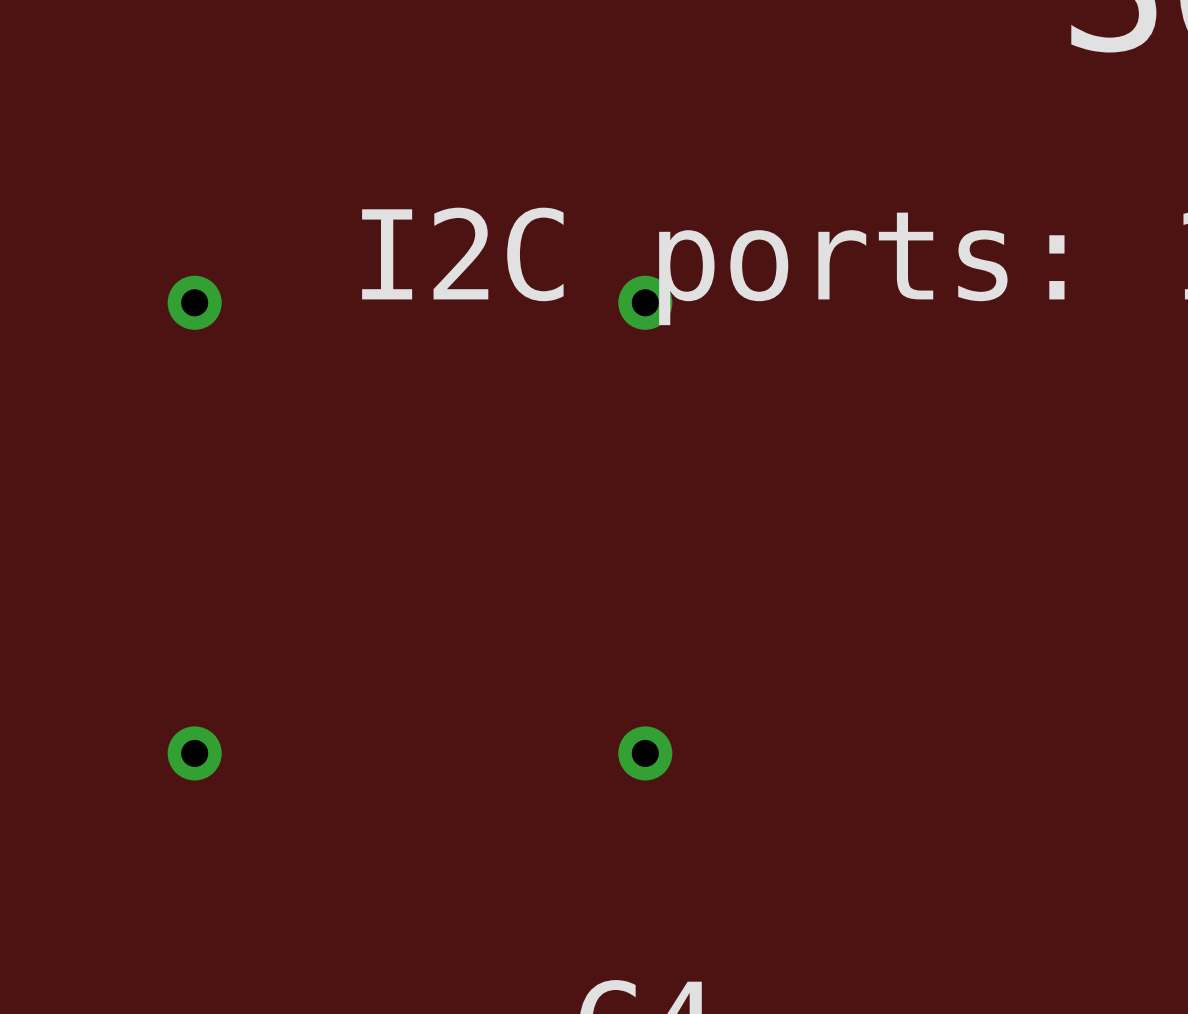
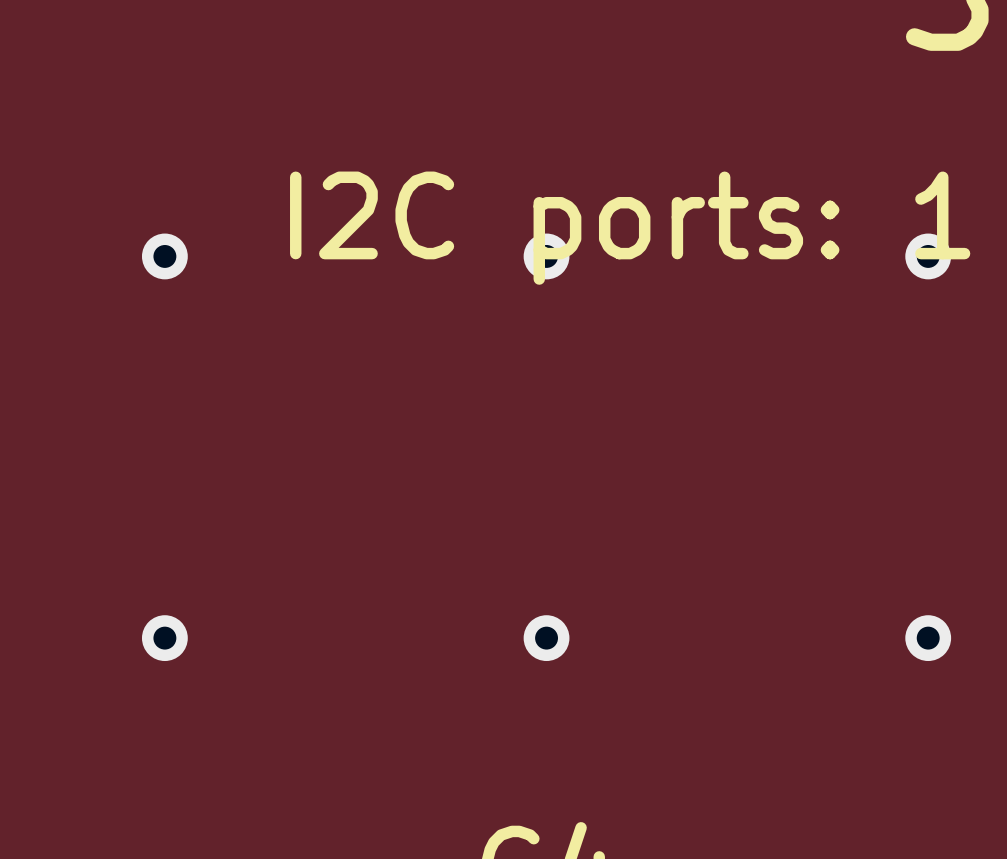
via: none -> (928, 256)
via: none -> (928, 638)

